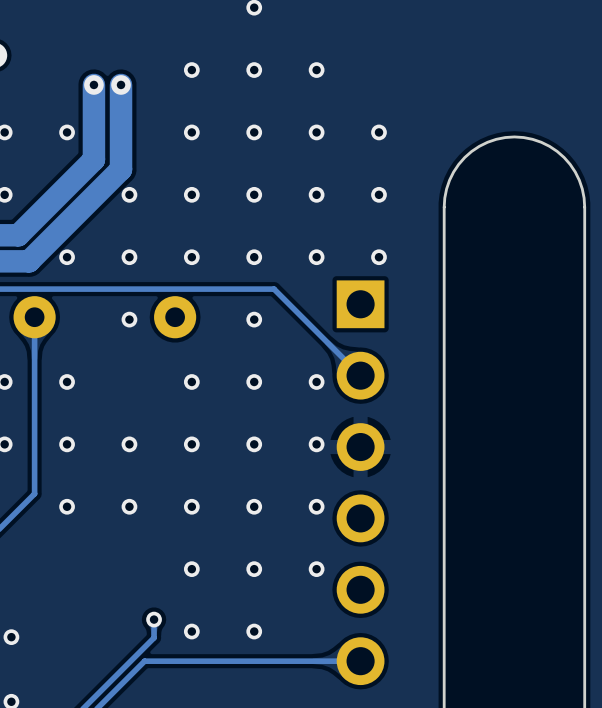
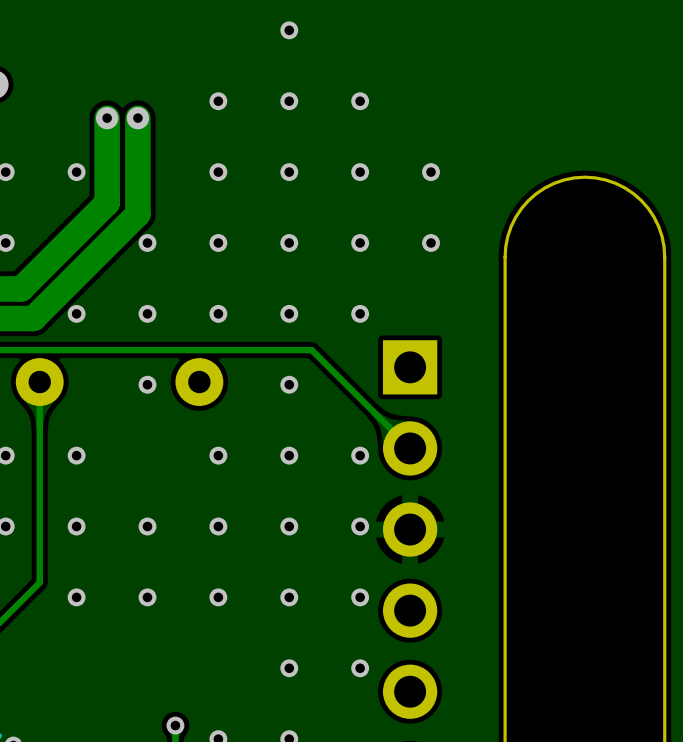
via: (378, 257) -> none
via: (191, 569) -> none

